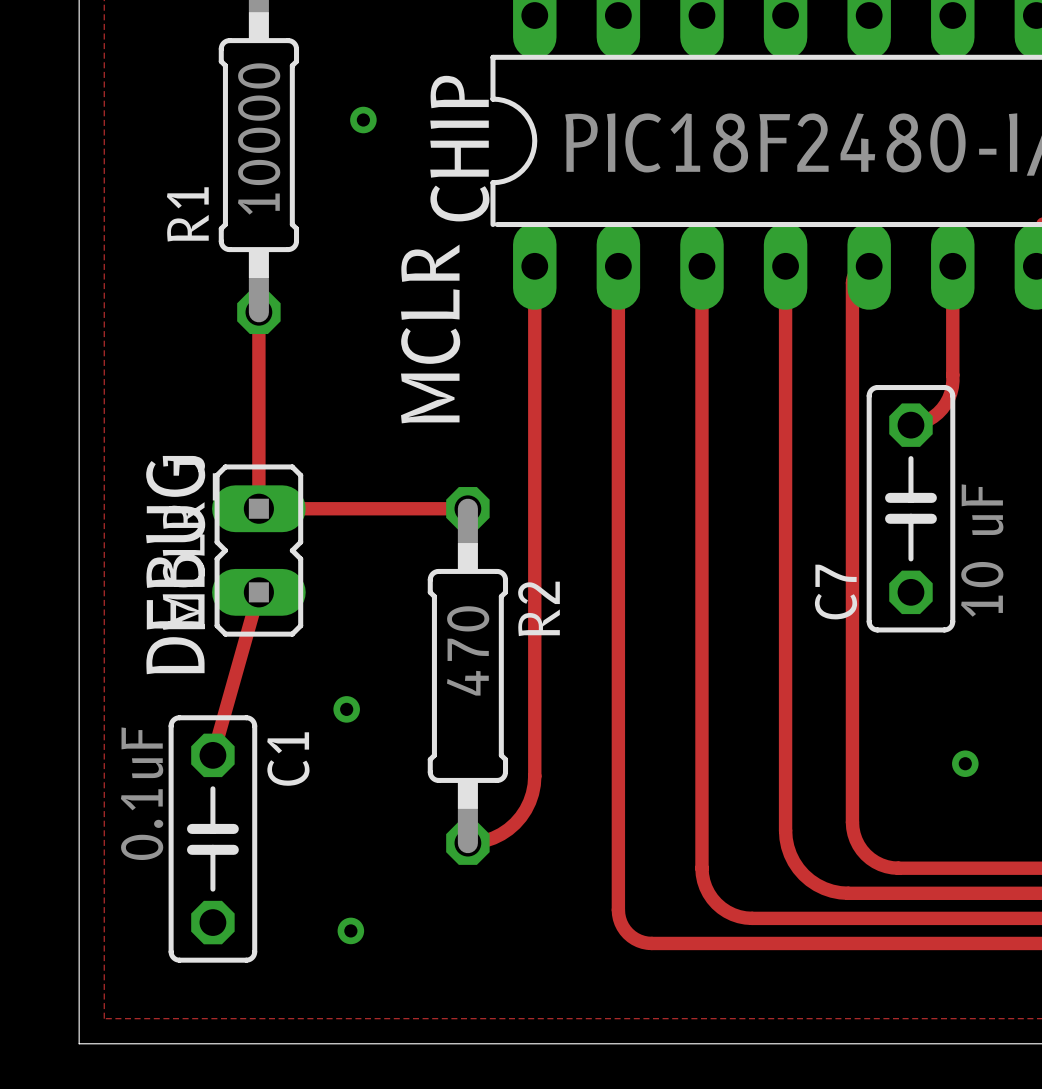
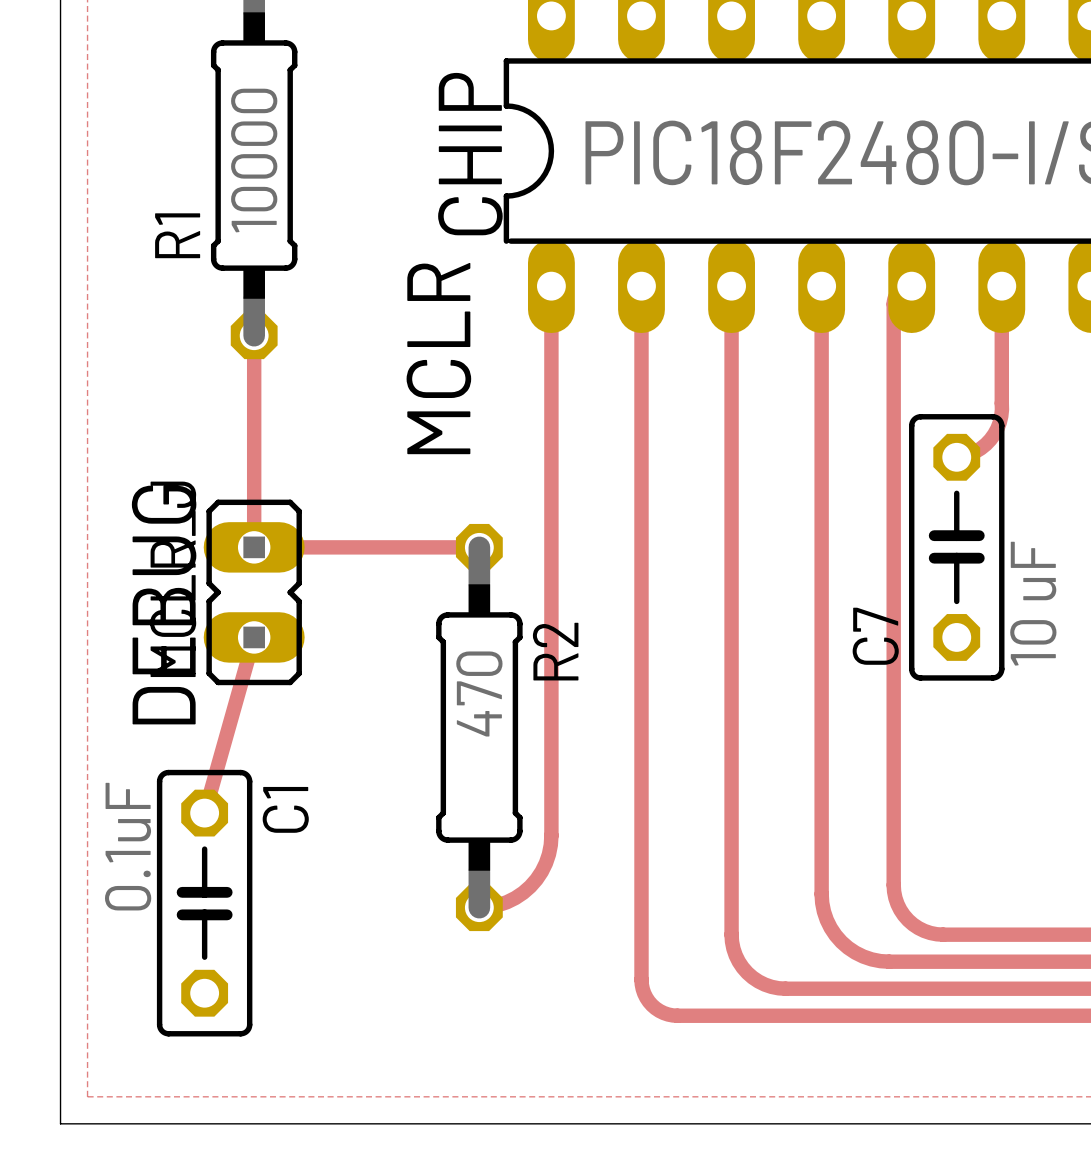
via: (363, 120) -> none
via: (346, 709) -> none
via: (965, 763) -> none
via: (350, 930) -> none

